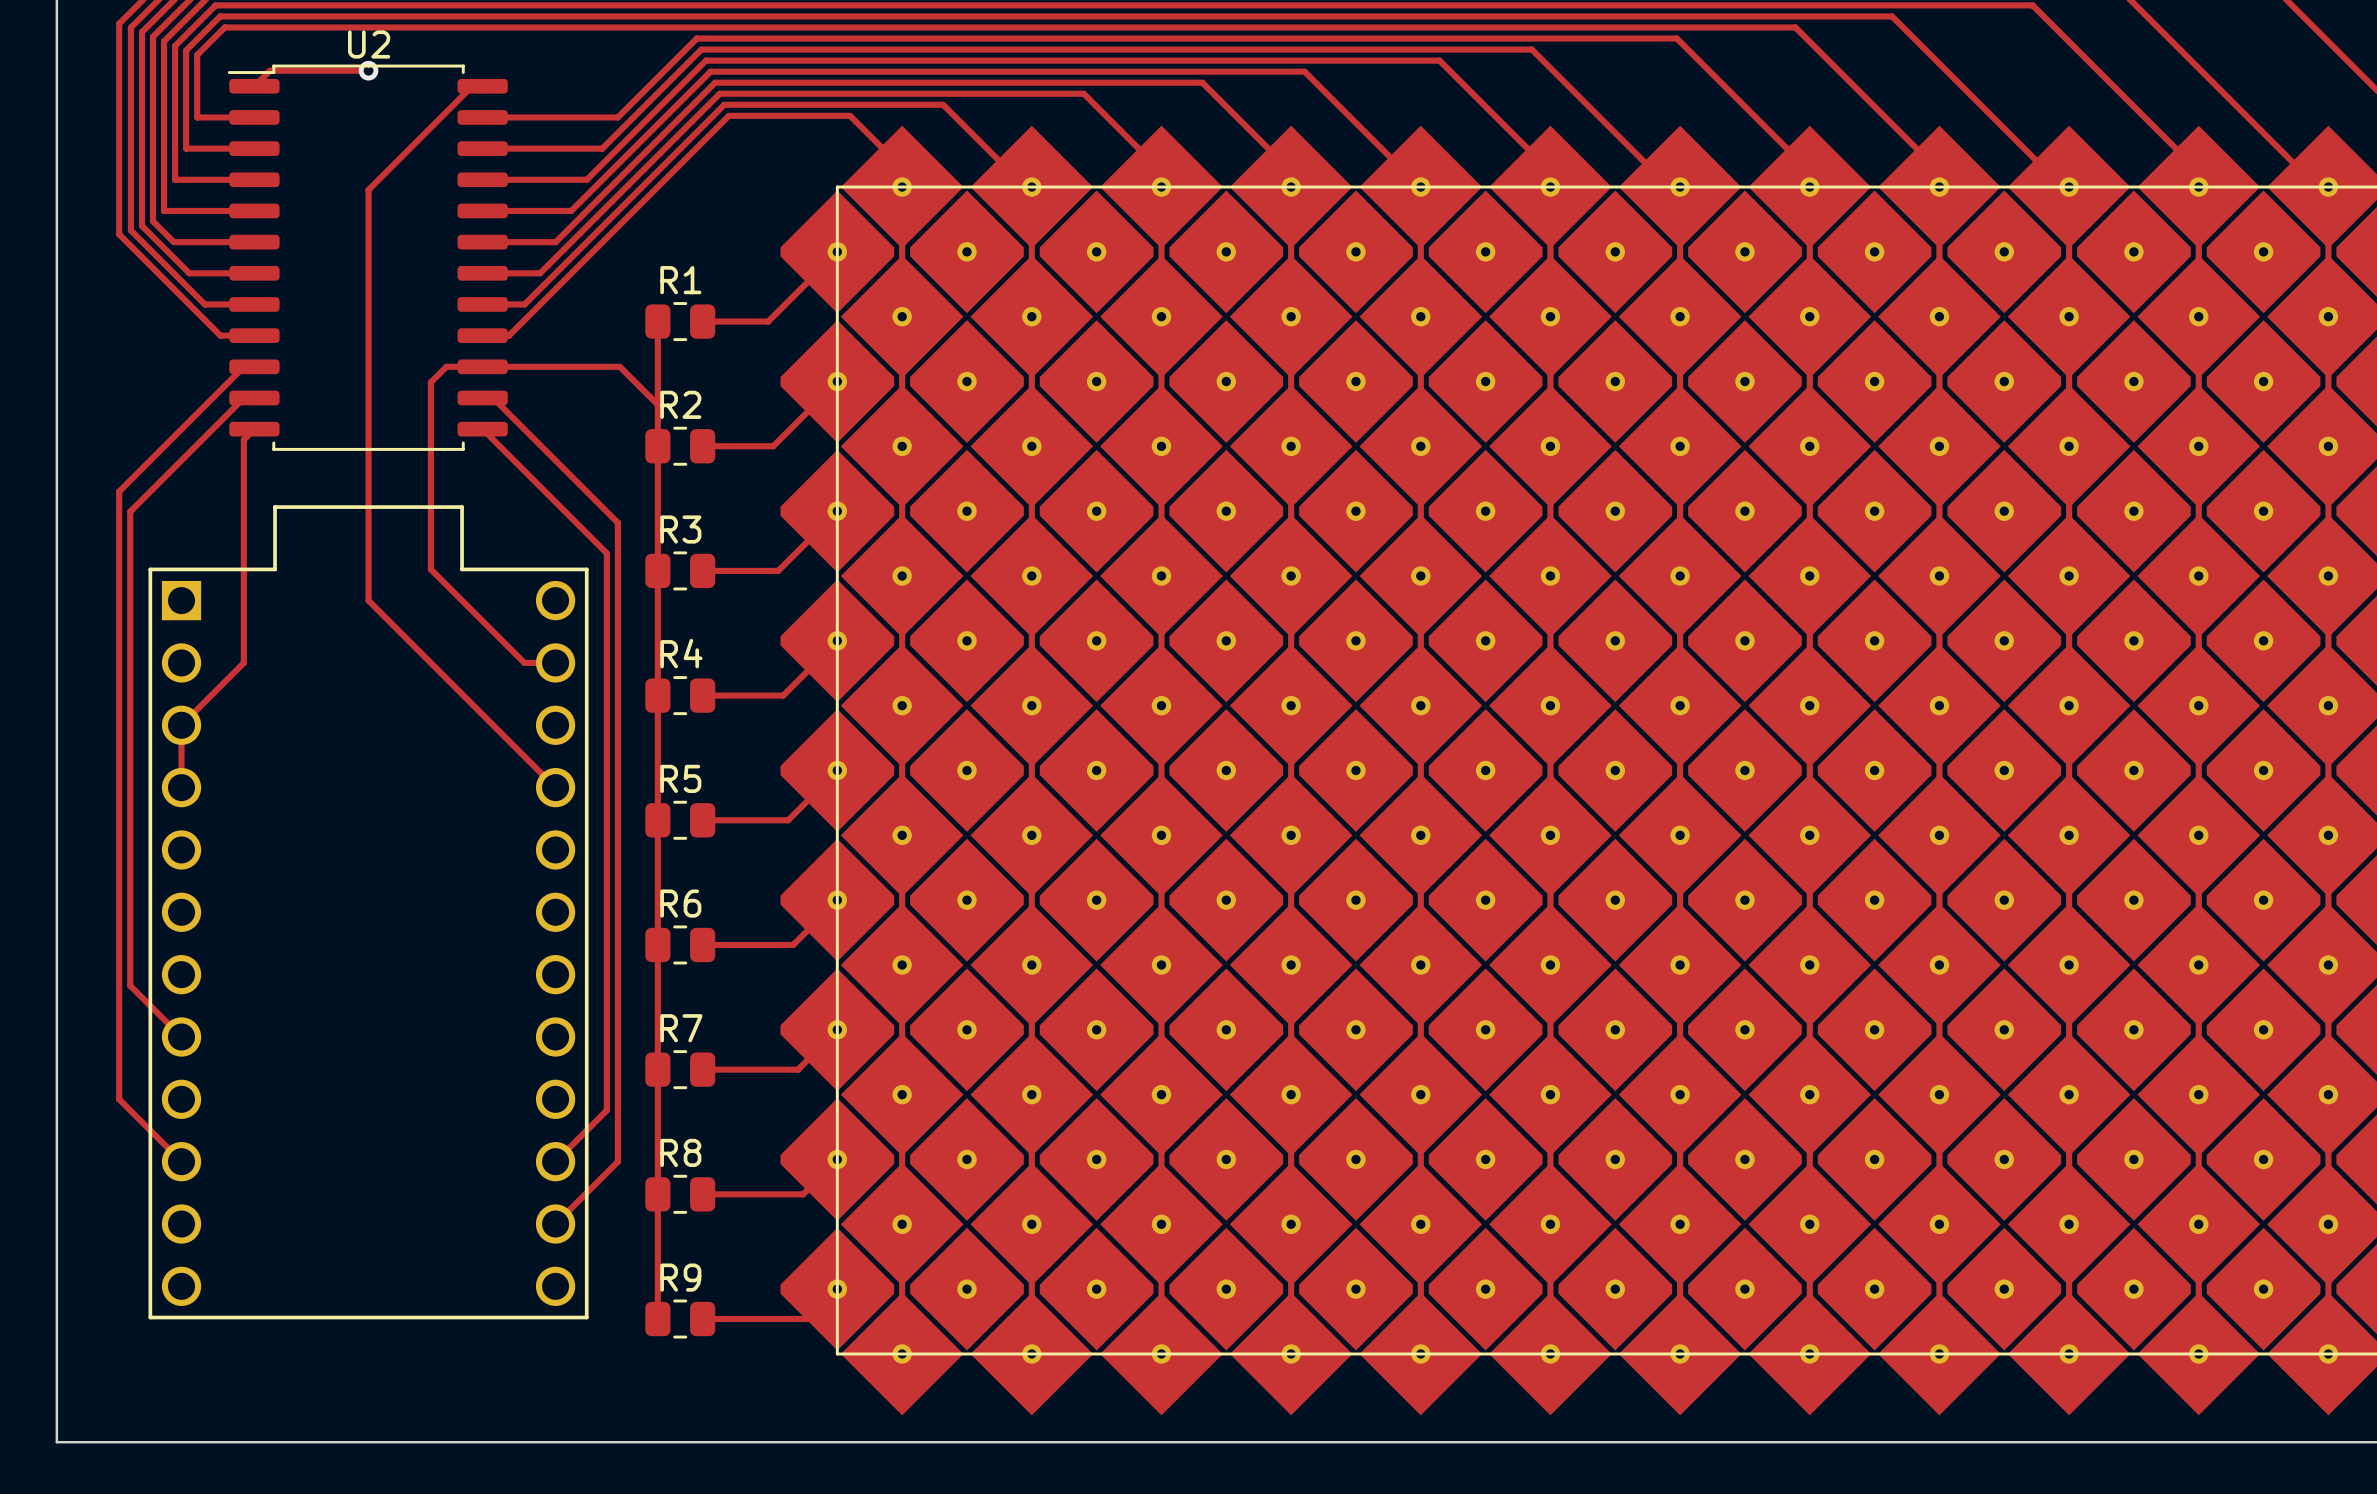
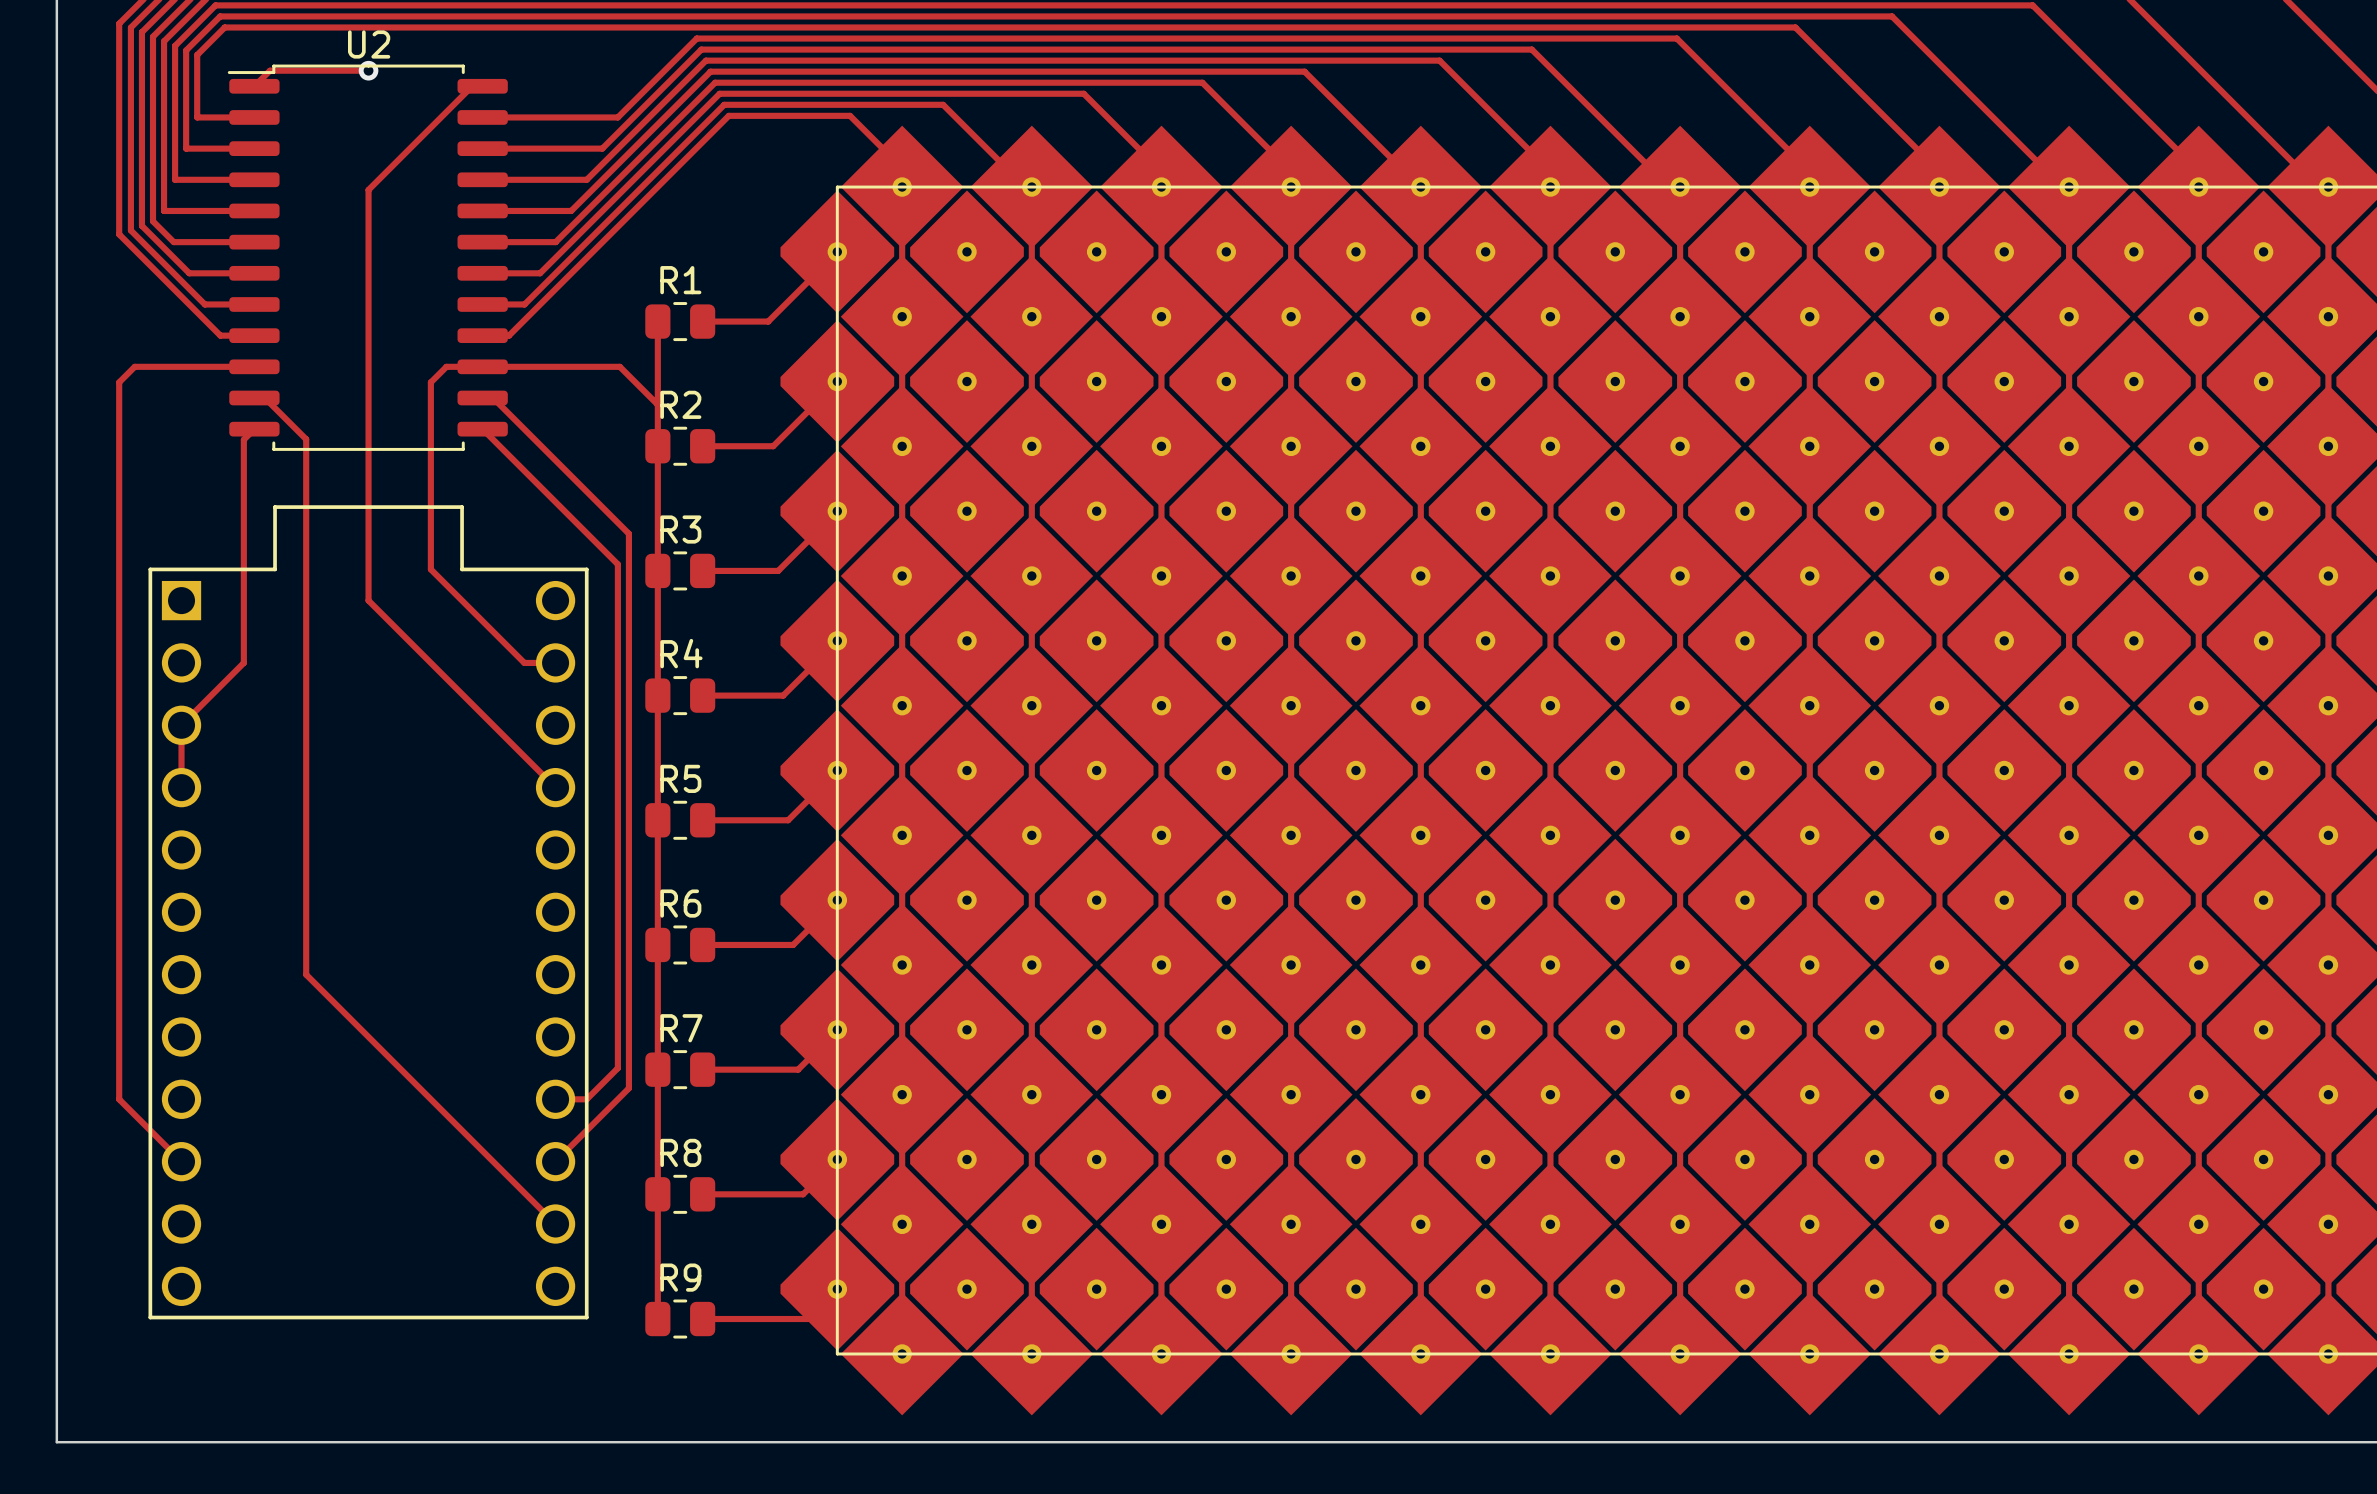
track: (243, 366) (119, 491) -> (243, 366) (134, 366) (119, 382) (119, 491)
track: (254, 397) (243, 397) (130, 511) (130, 985) (181, 1036) -> (254, 397) (264, 397) (306, 439) (306, 974) (555, 1224)
track: (617, 522) (617, 564) -> (606, 553) (617, 564)
track: (606, 553) (606, 1110) -> (617, 522) (628, 533) (628, 1088) (606, 1110)
track: (617, 1068) (617, 1161) (555, 1224) -> (617, 1068) (586, 1099) (555, 1099)

